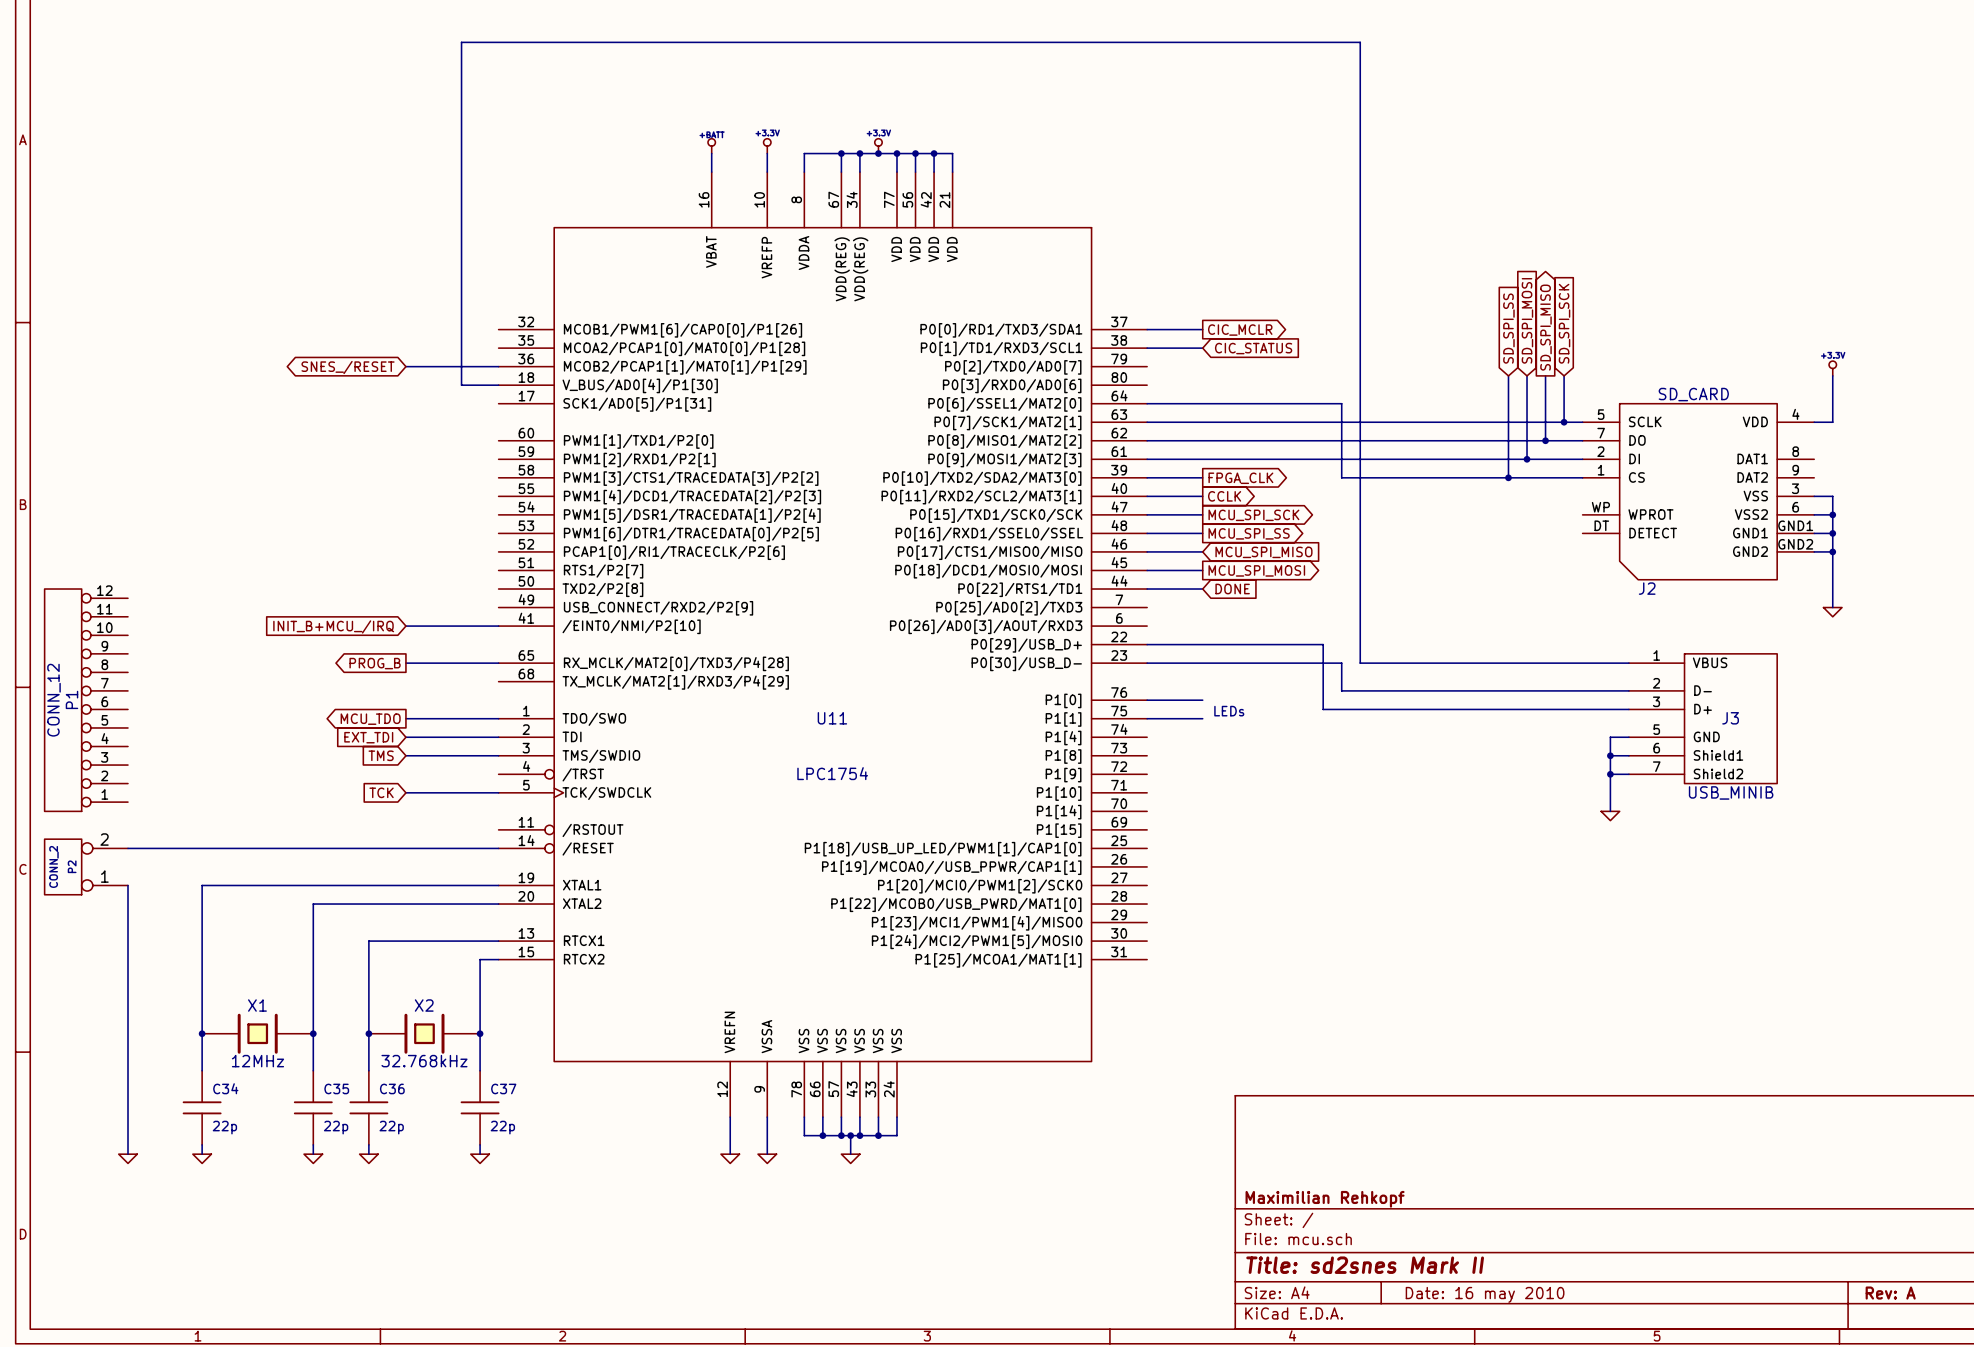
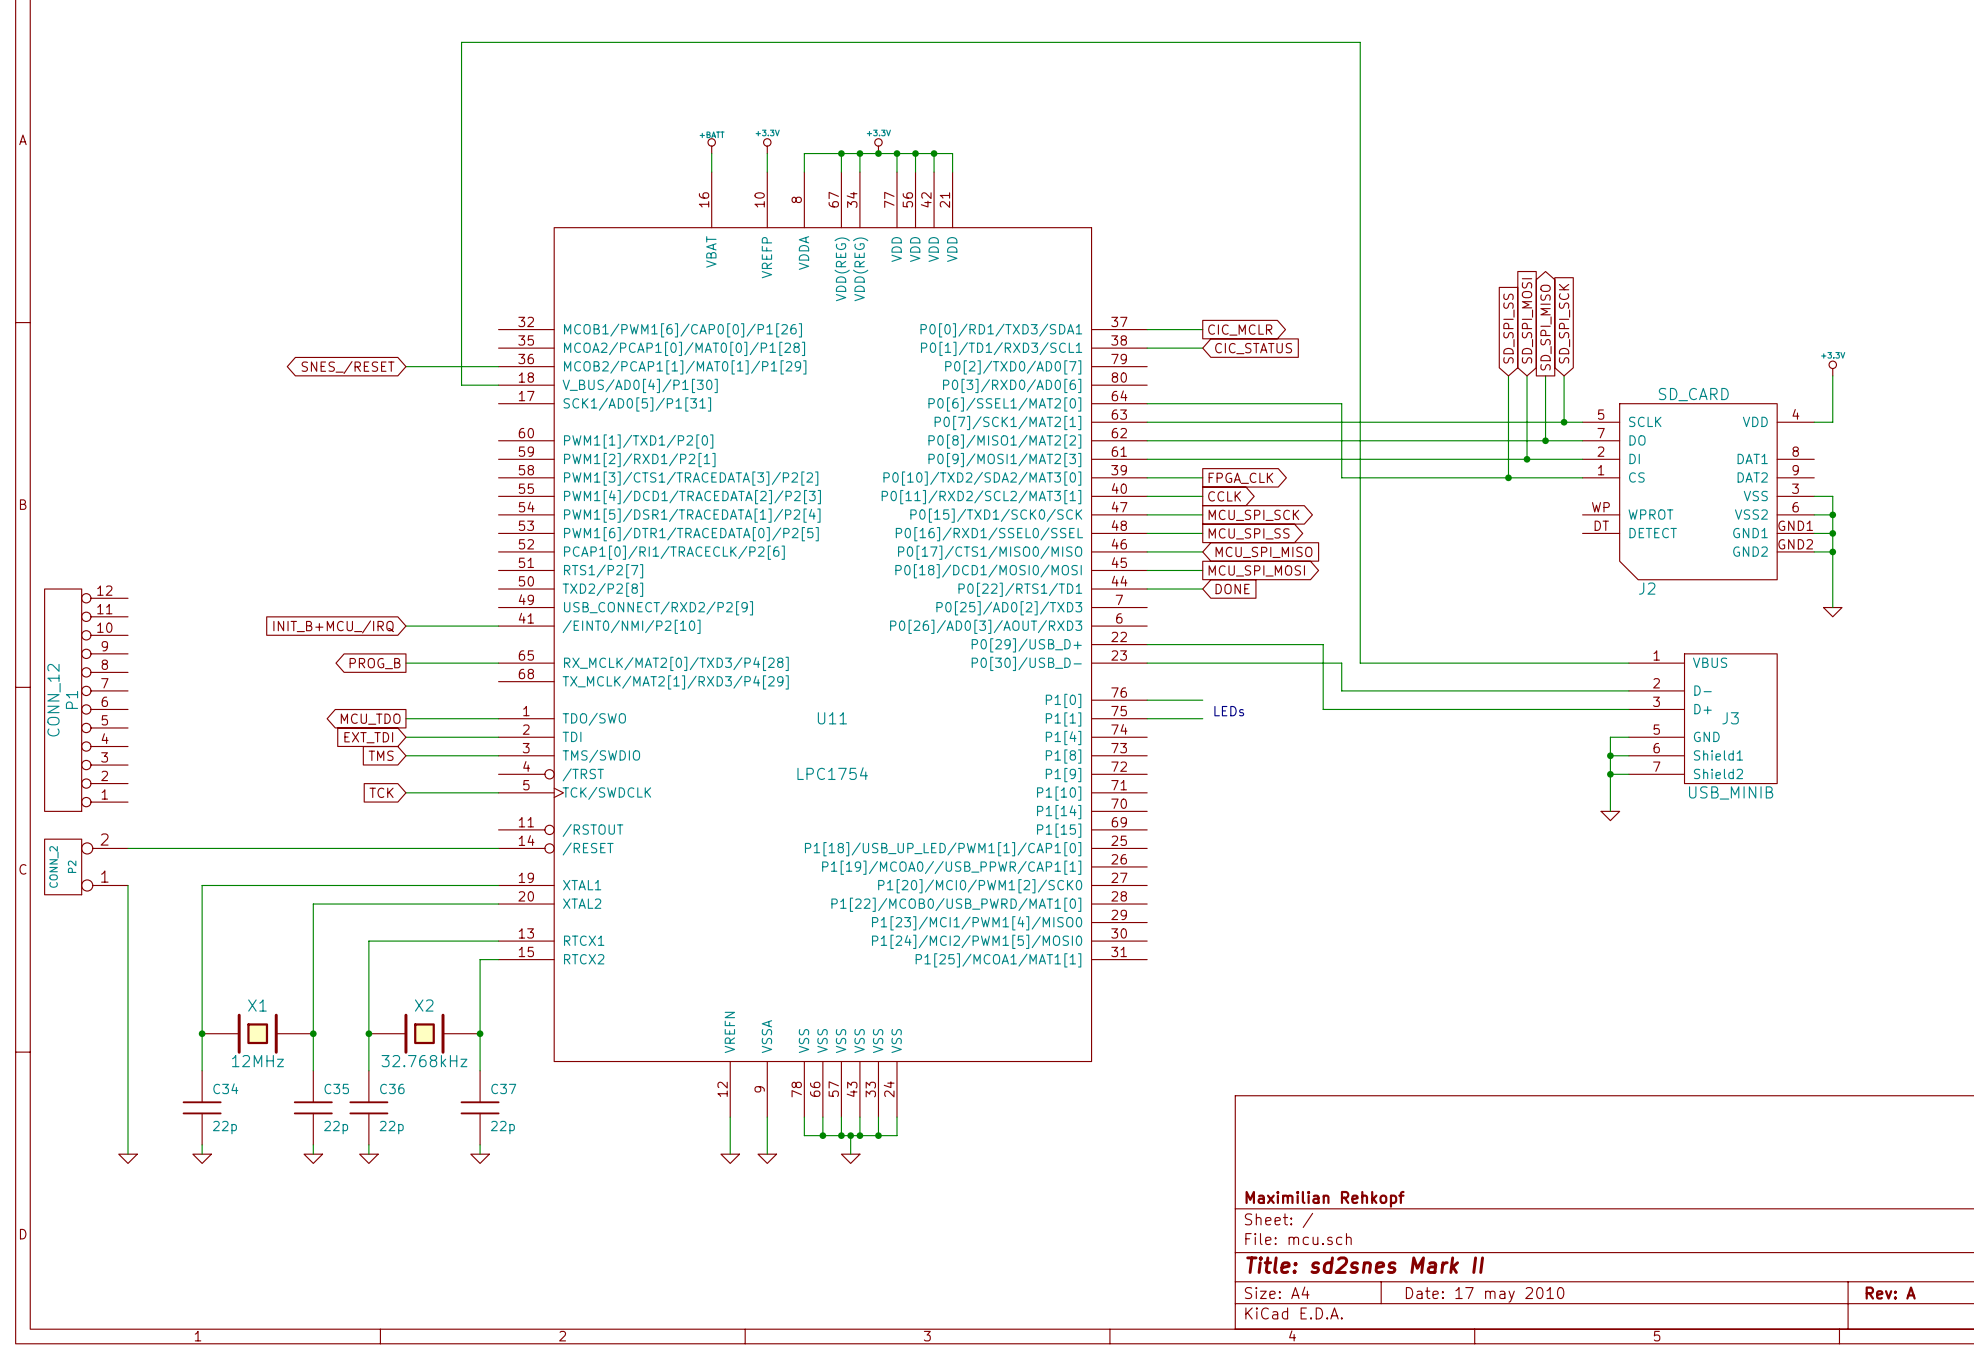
title block: Date: 16 may 2010 (1485, 1294) -> Date: 17 may 2010 (1485, 1294)

